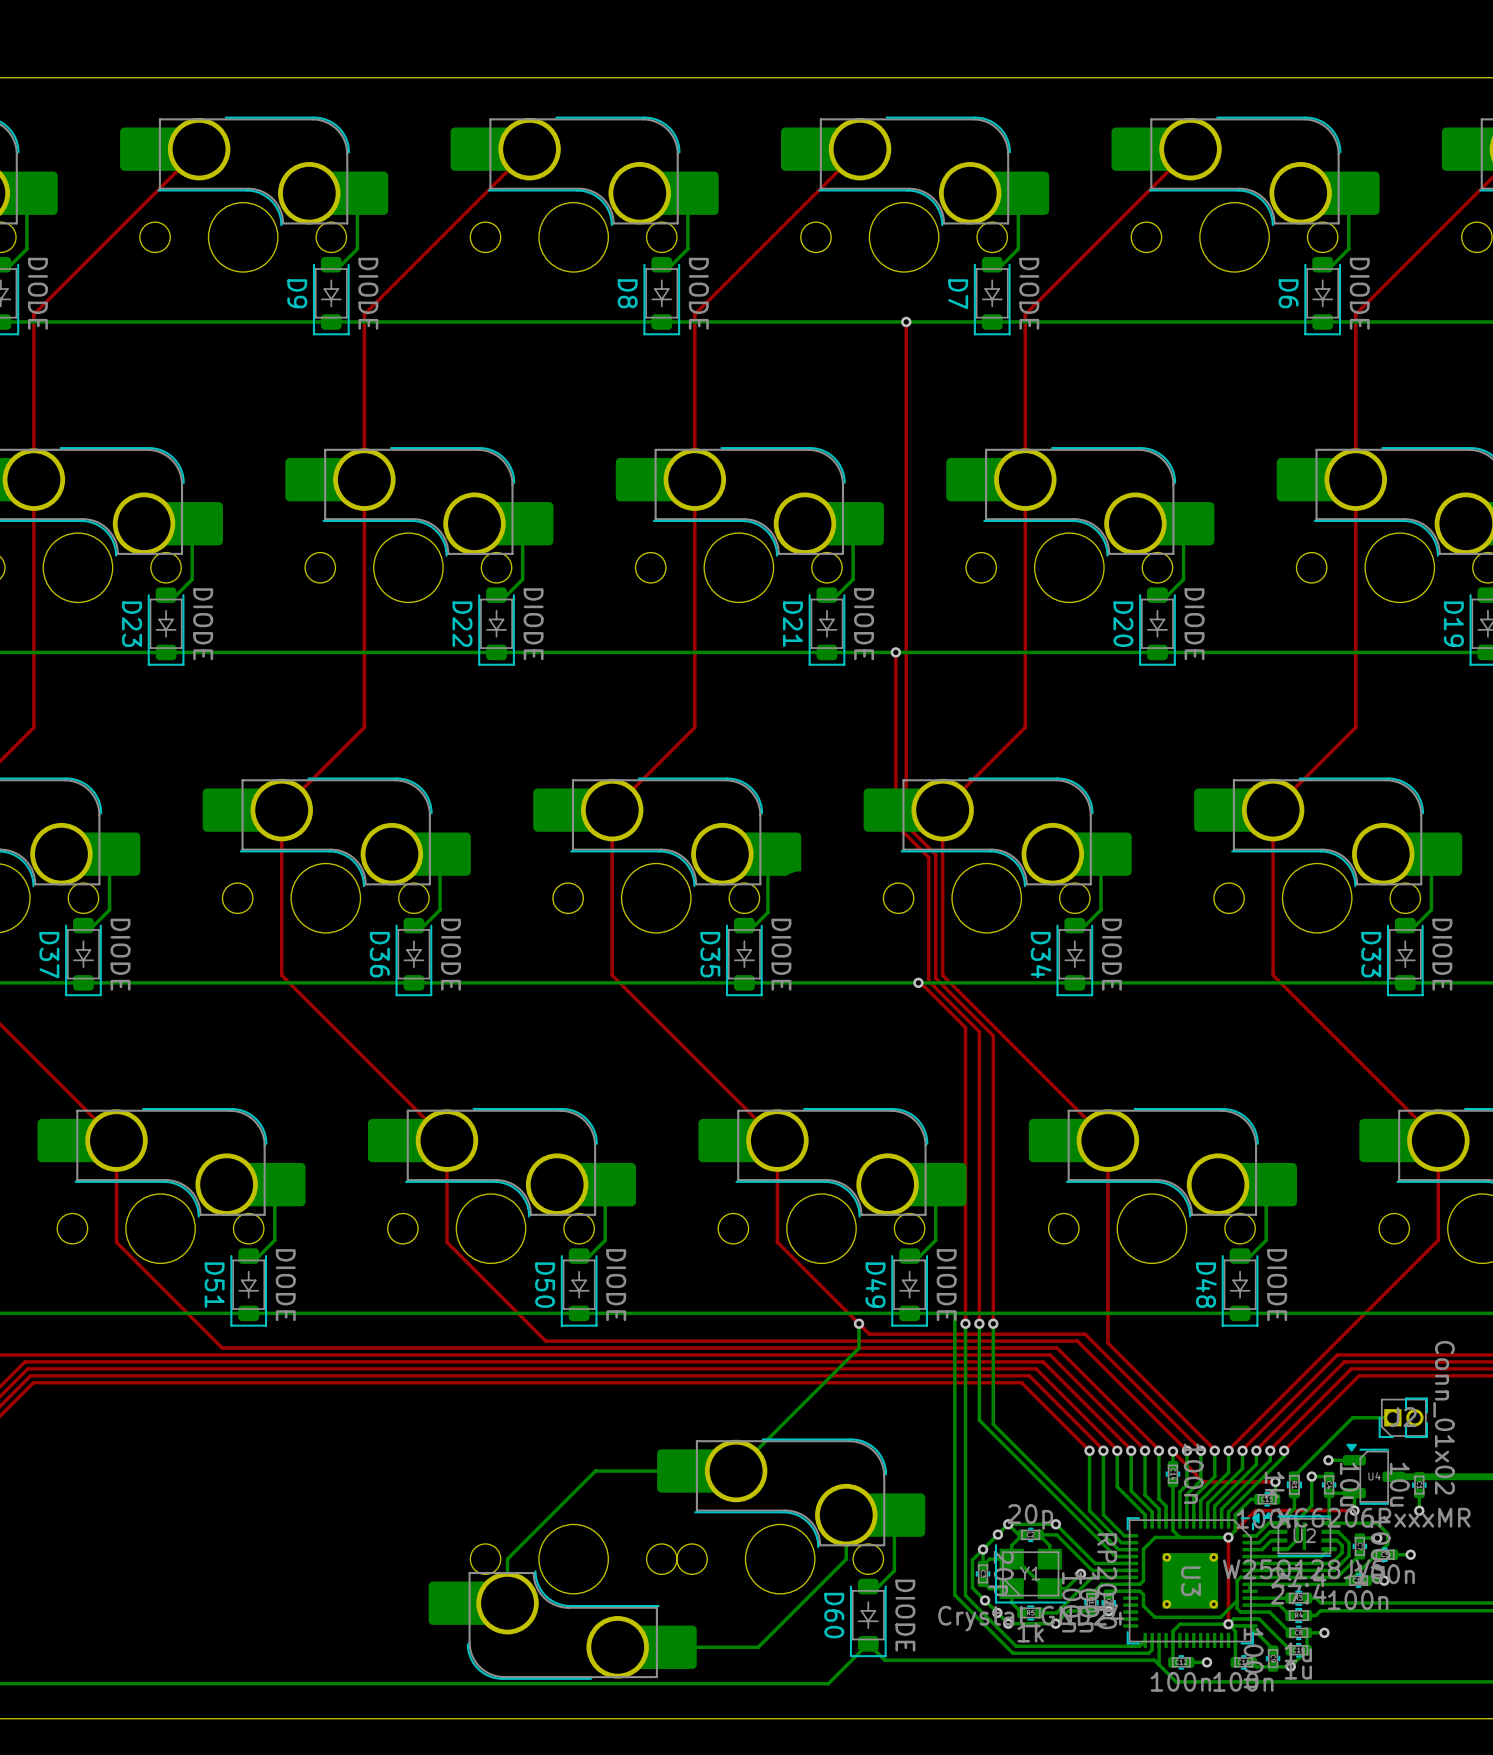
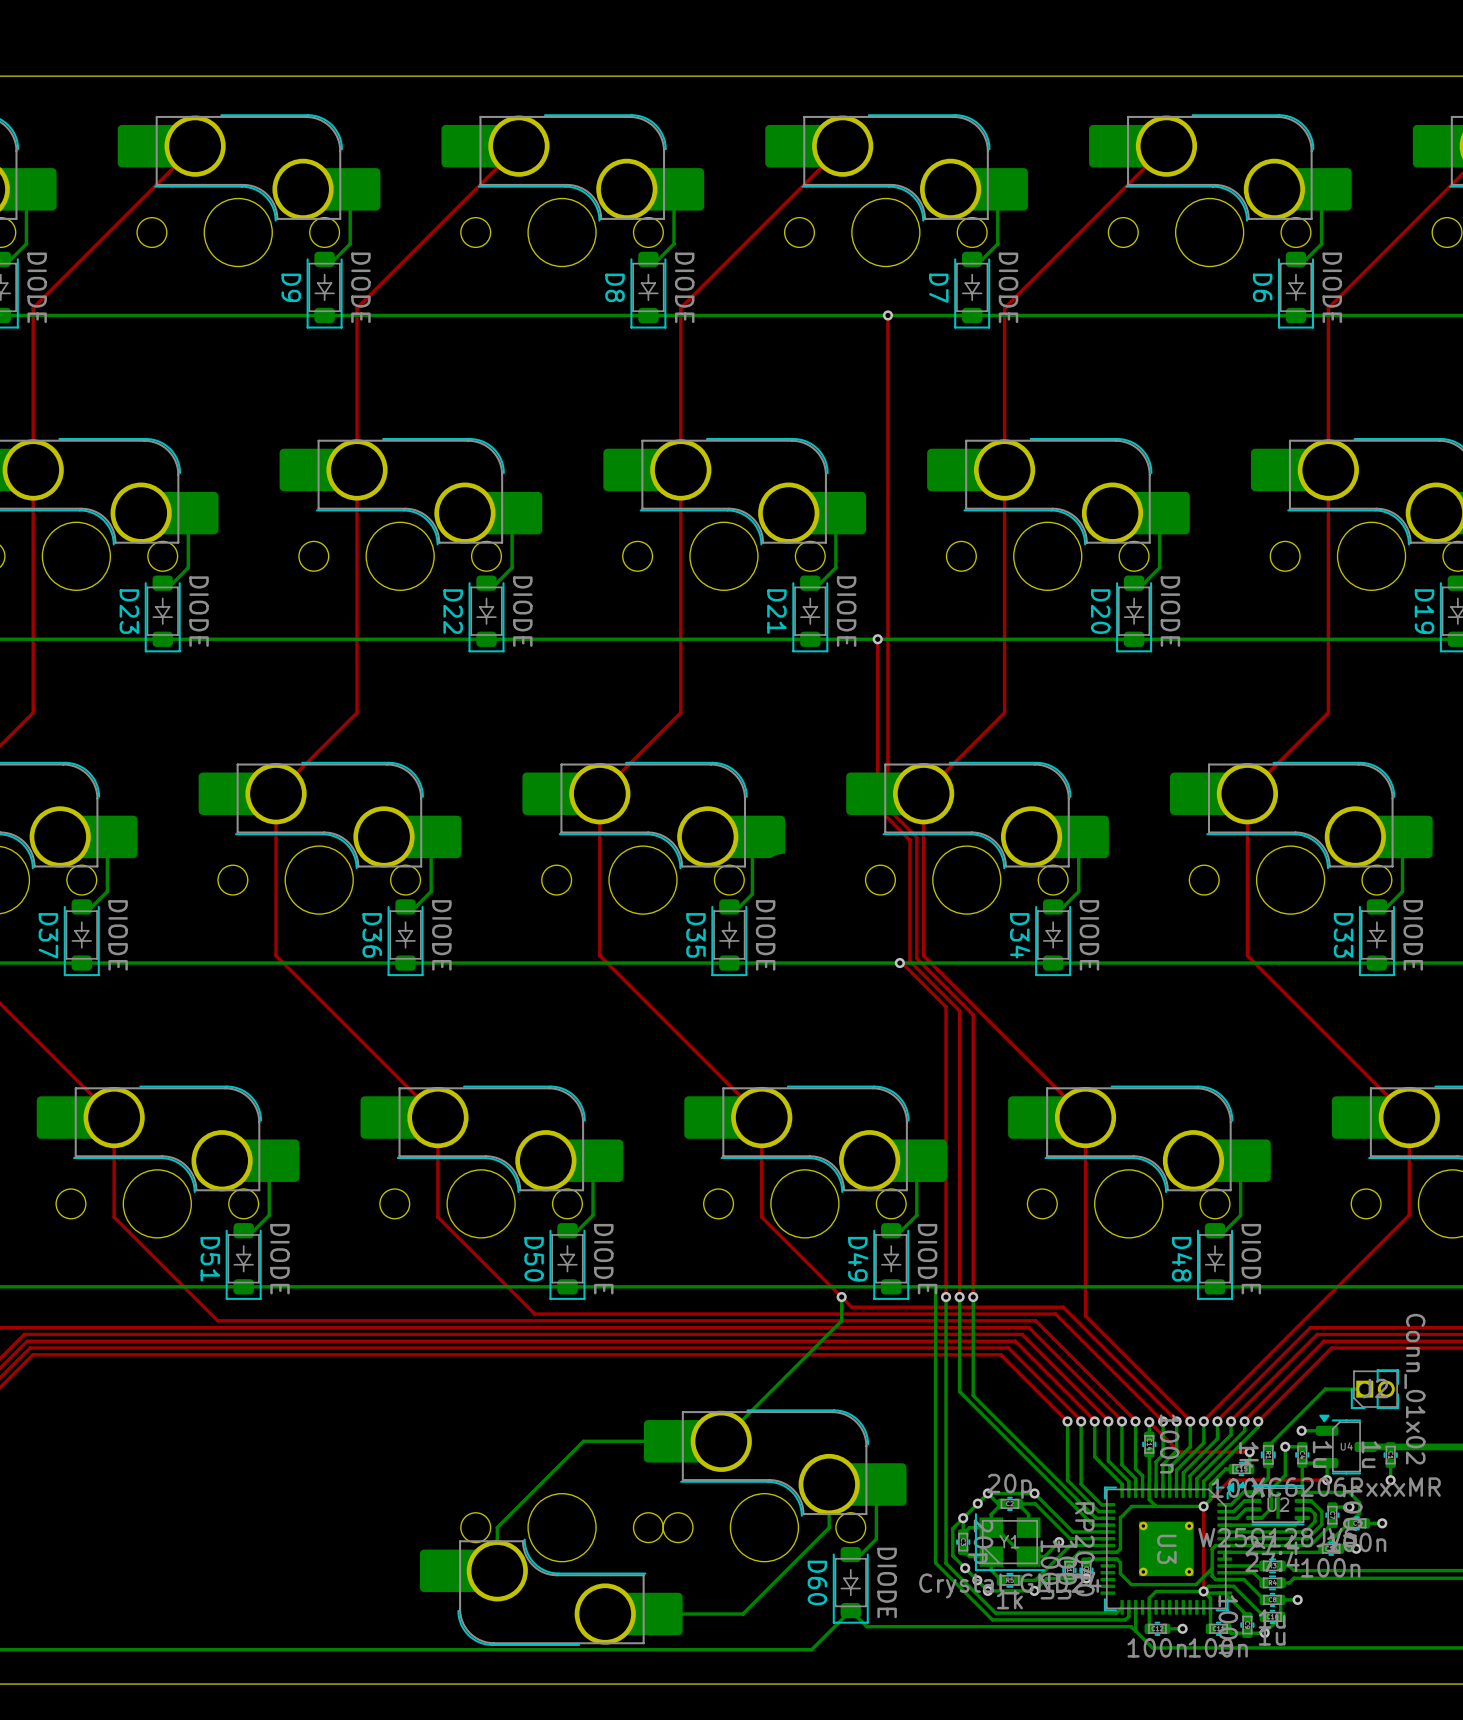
part value: 10u (1349, 1484) -> 1u (1322, 1454)
part value: 10u (1399, 1484) -> 1u (1371, 1454)

